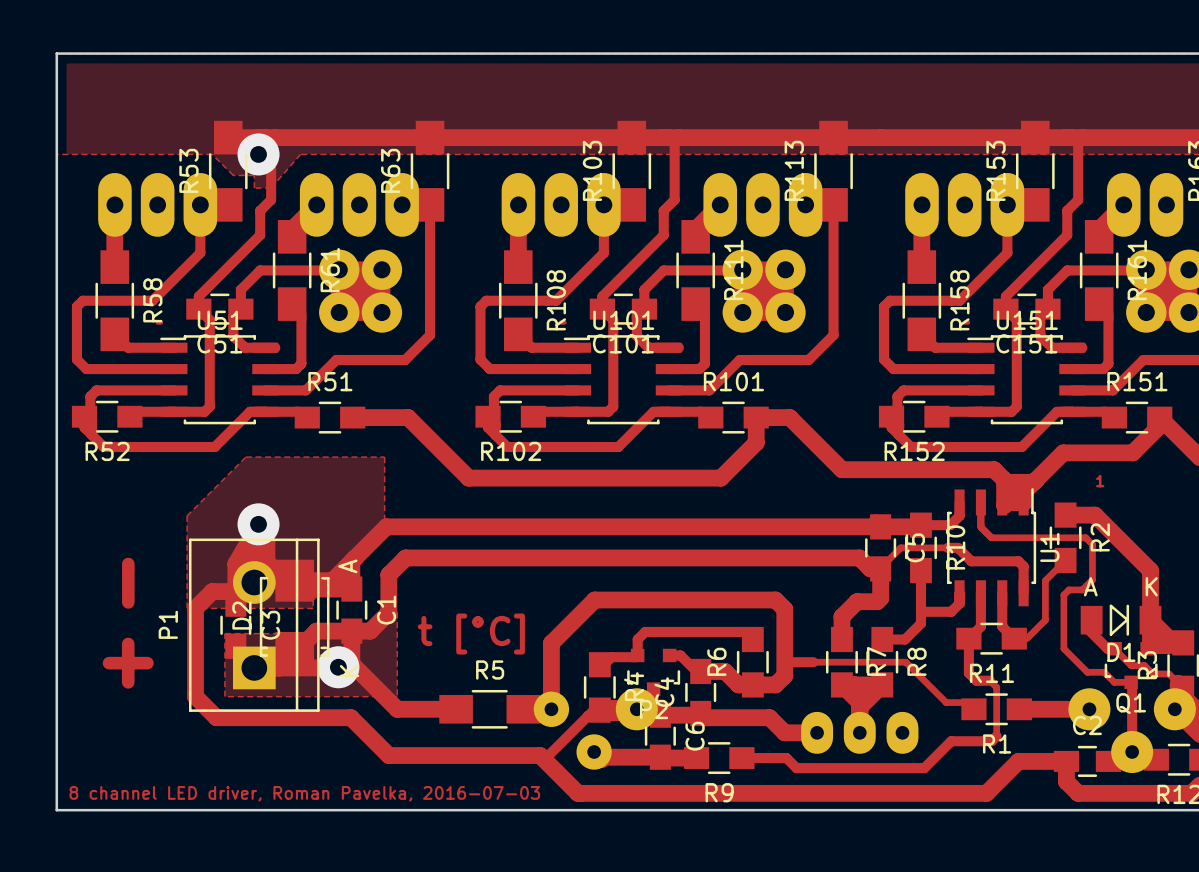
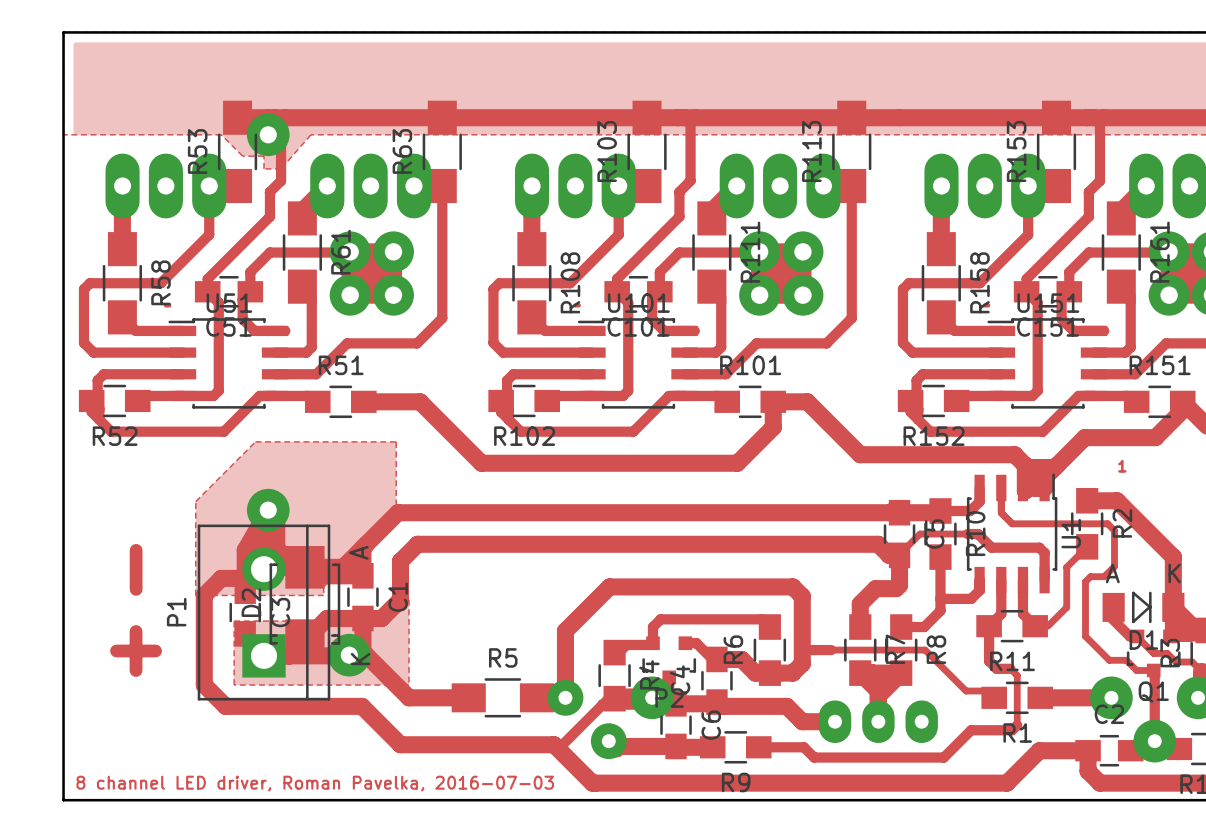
text: t [°C] (471, 634) -> none

